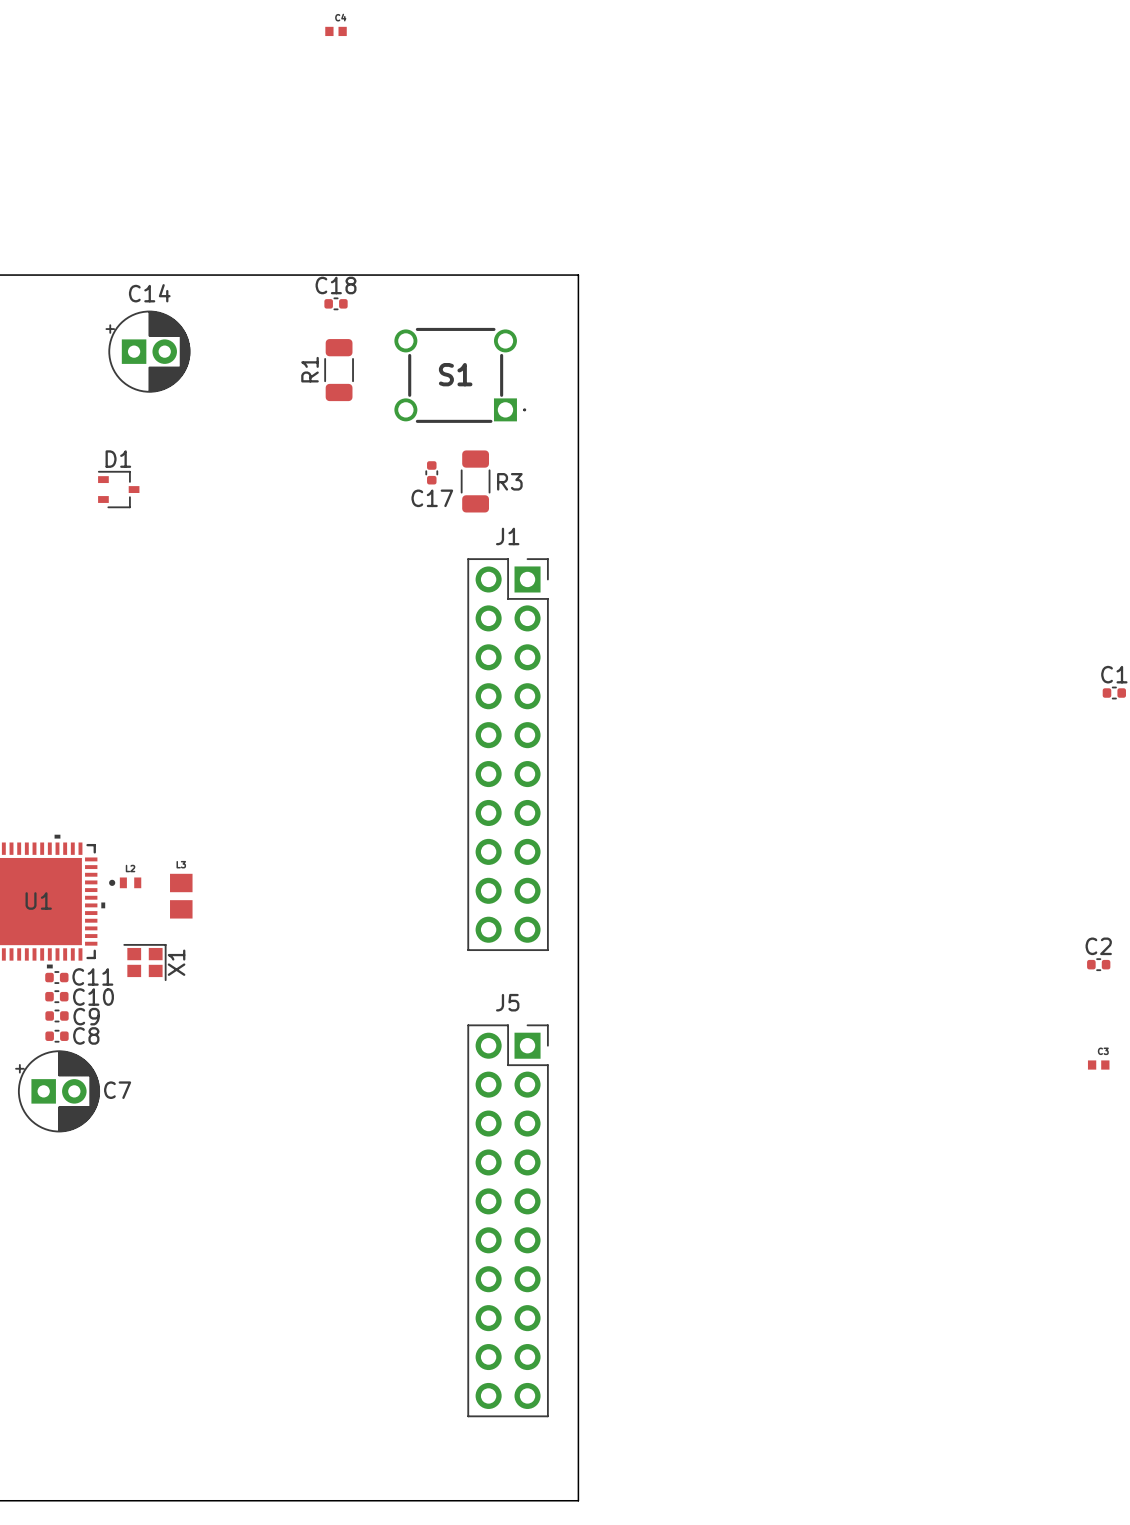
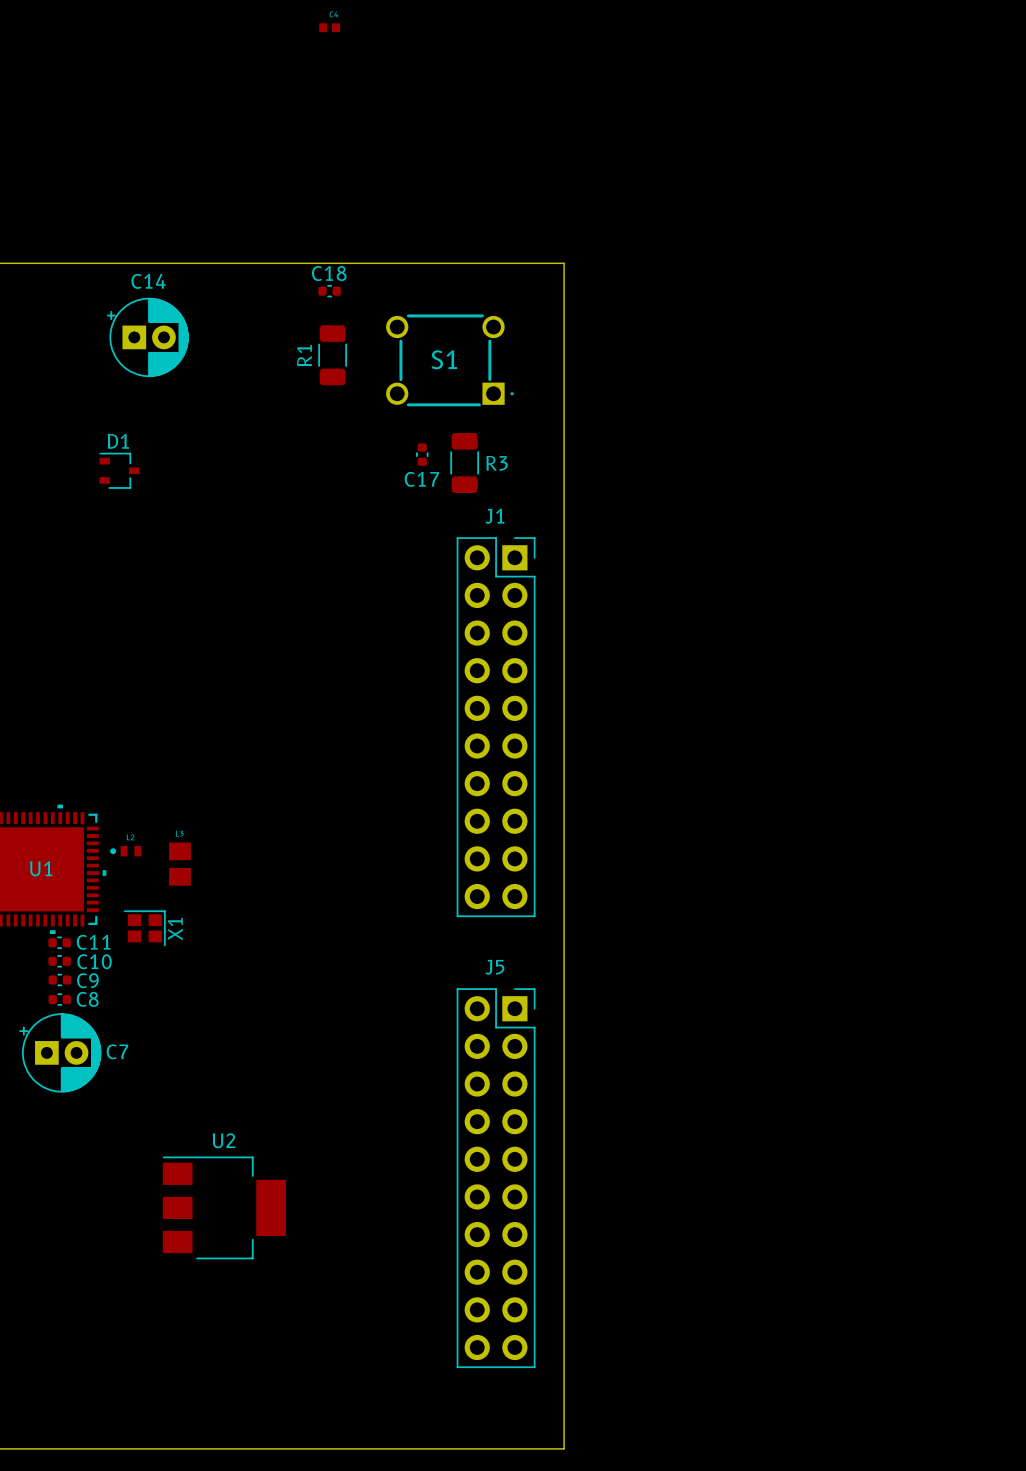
U2: none -> (224, 1207)

